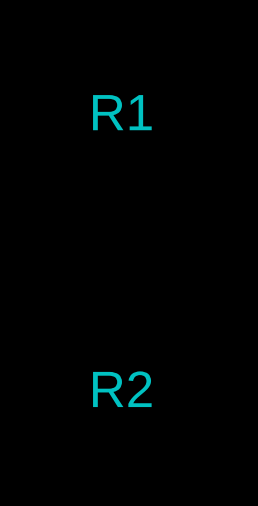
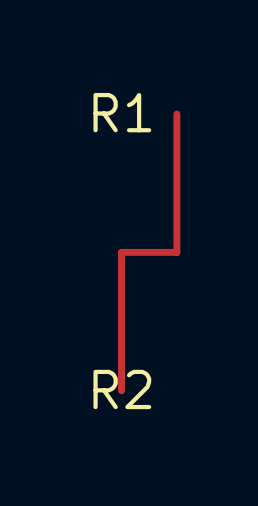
top track: none -> (176, 113) (176, 252) (121, 252) (121, 390)

